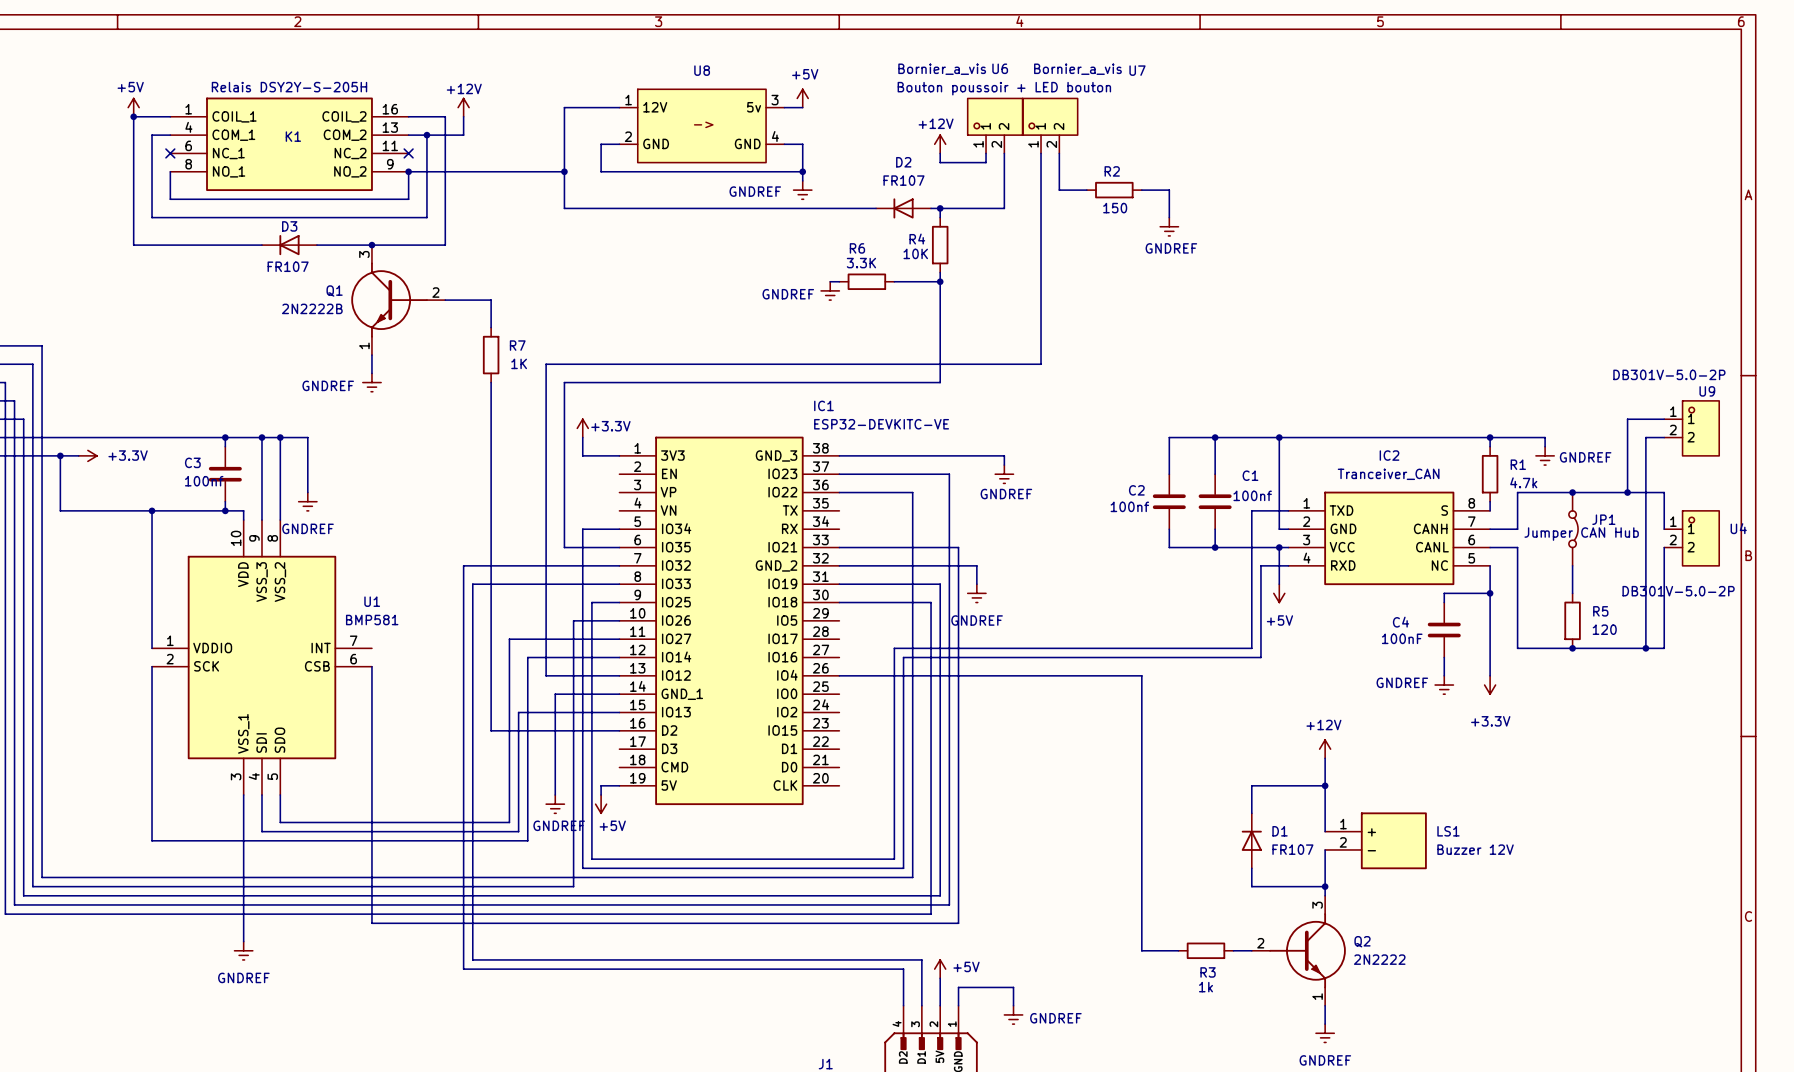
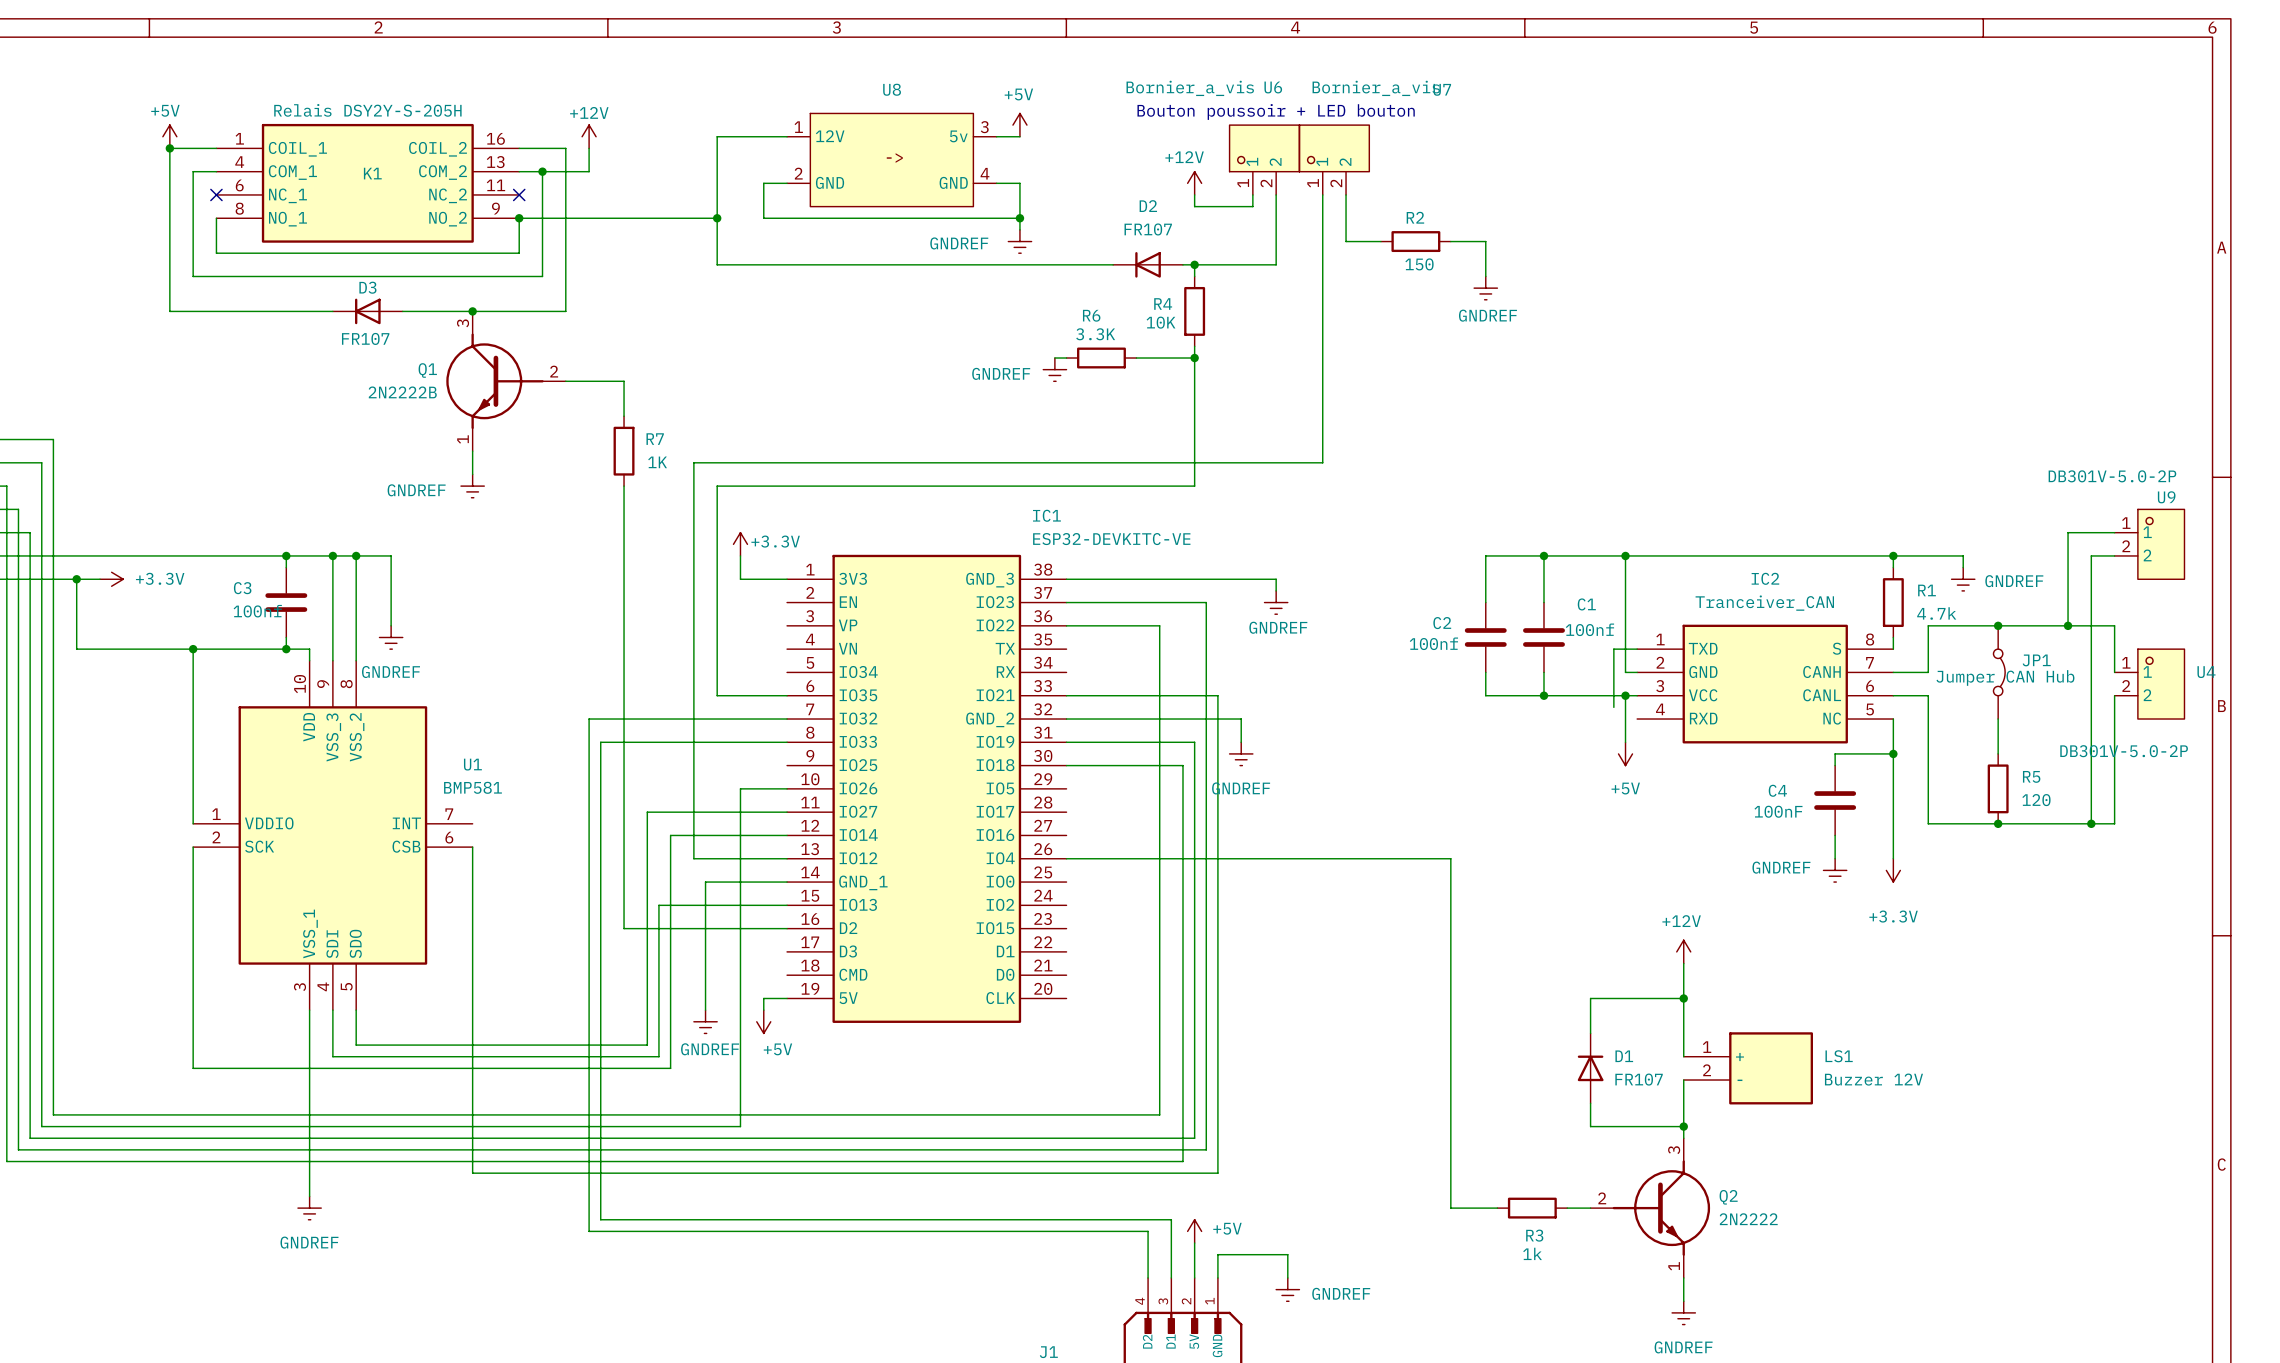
wire: (1270, 510) (1251, 510) (1251, 648) (894, 648) (894, 859) (591, 859) (591, 602) (619, 602) -> (1613, 649) (1613, 707)
wire: (619, 529) (582, 529) (582, 620) (573, 620) (573, 886) -> (740, 1103) (740, 1126) (728, 1126)
wire: (1288, 565) (1260, 565) (1260, 657) (903, 657) (903, 868) (582, 868) -> none

